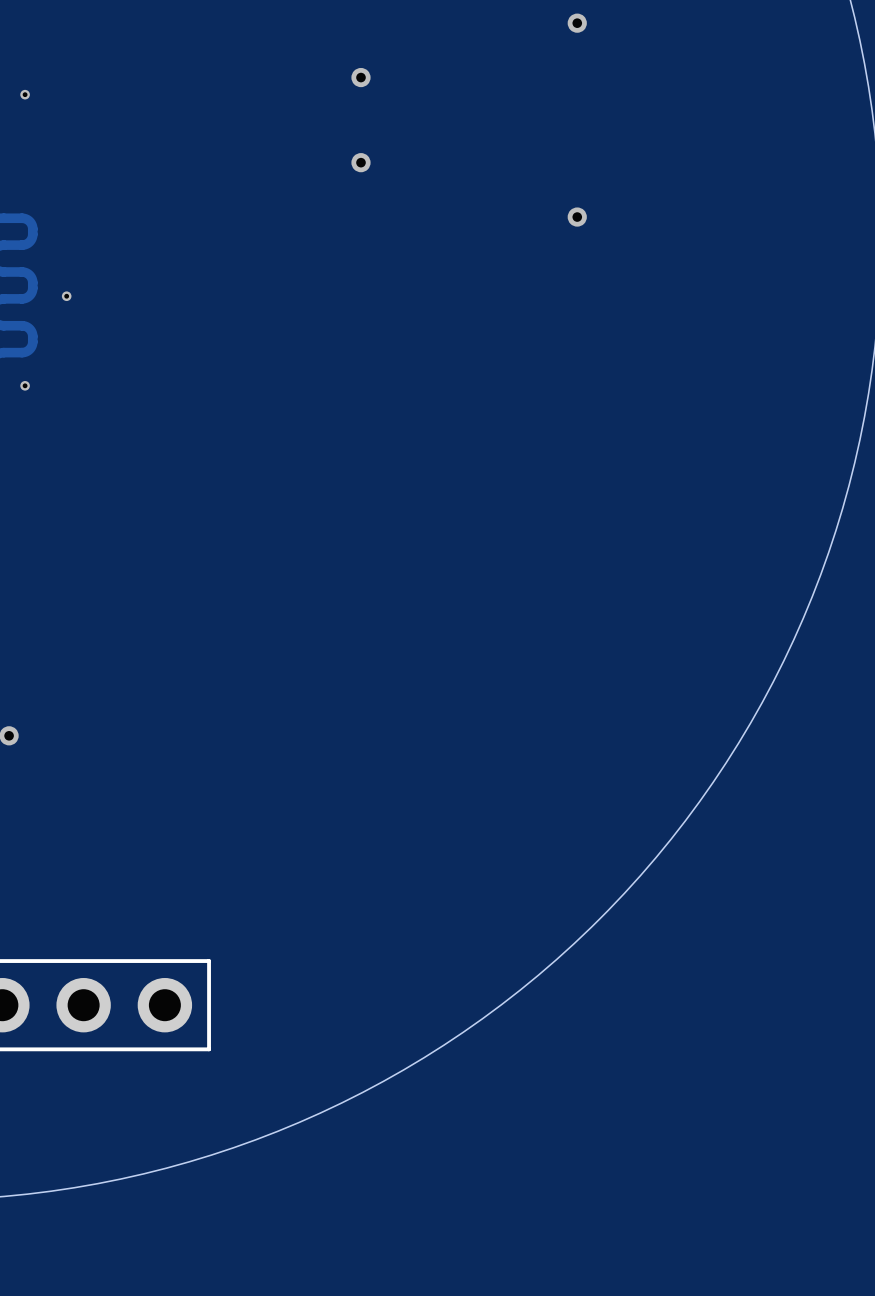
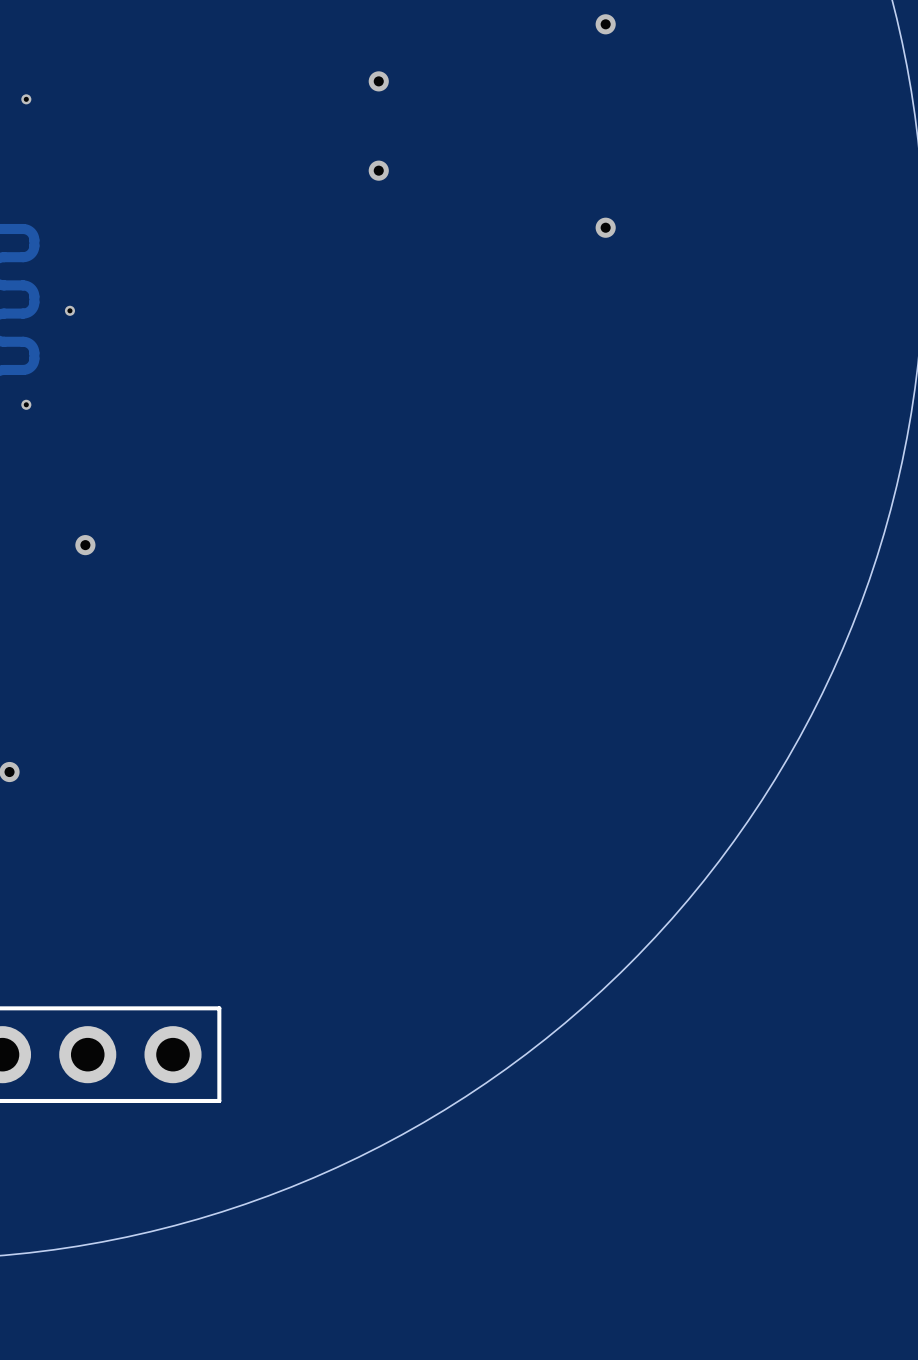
via: none -> (85, 545)

